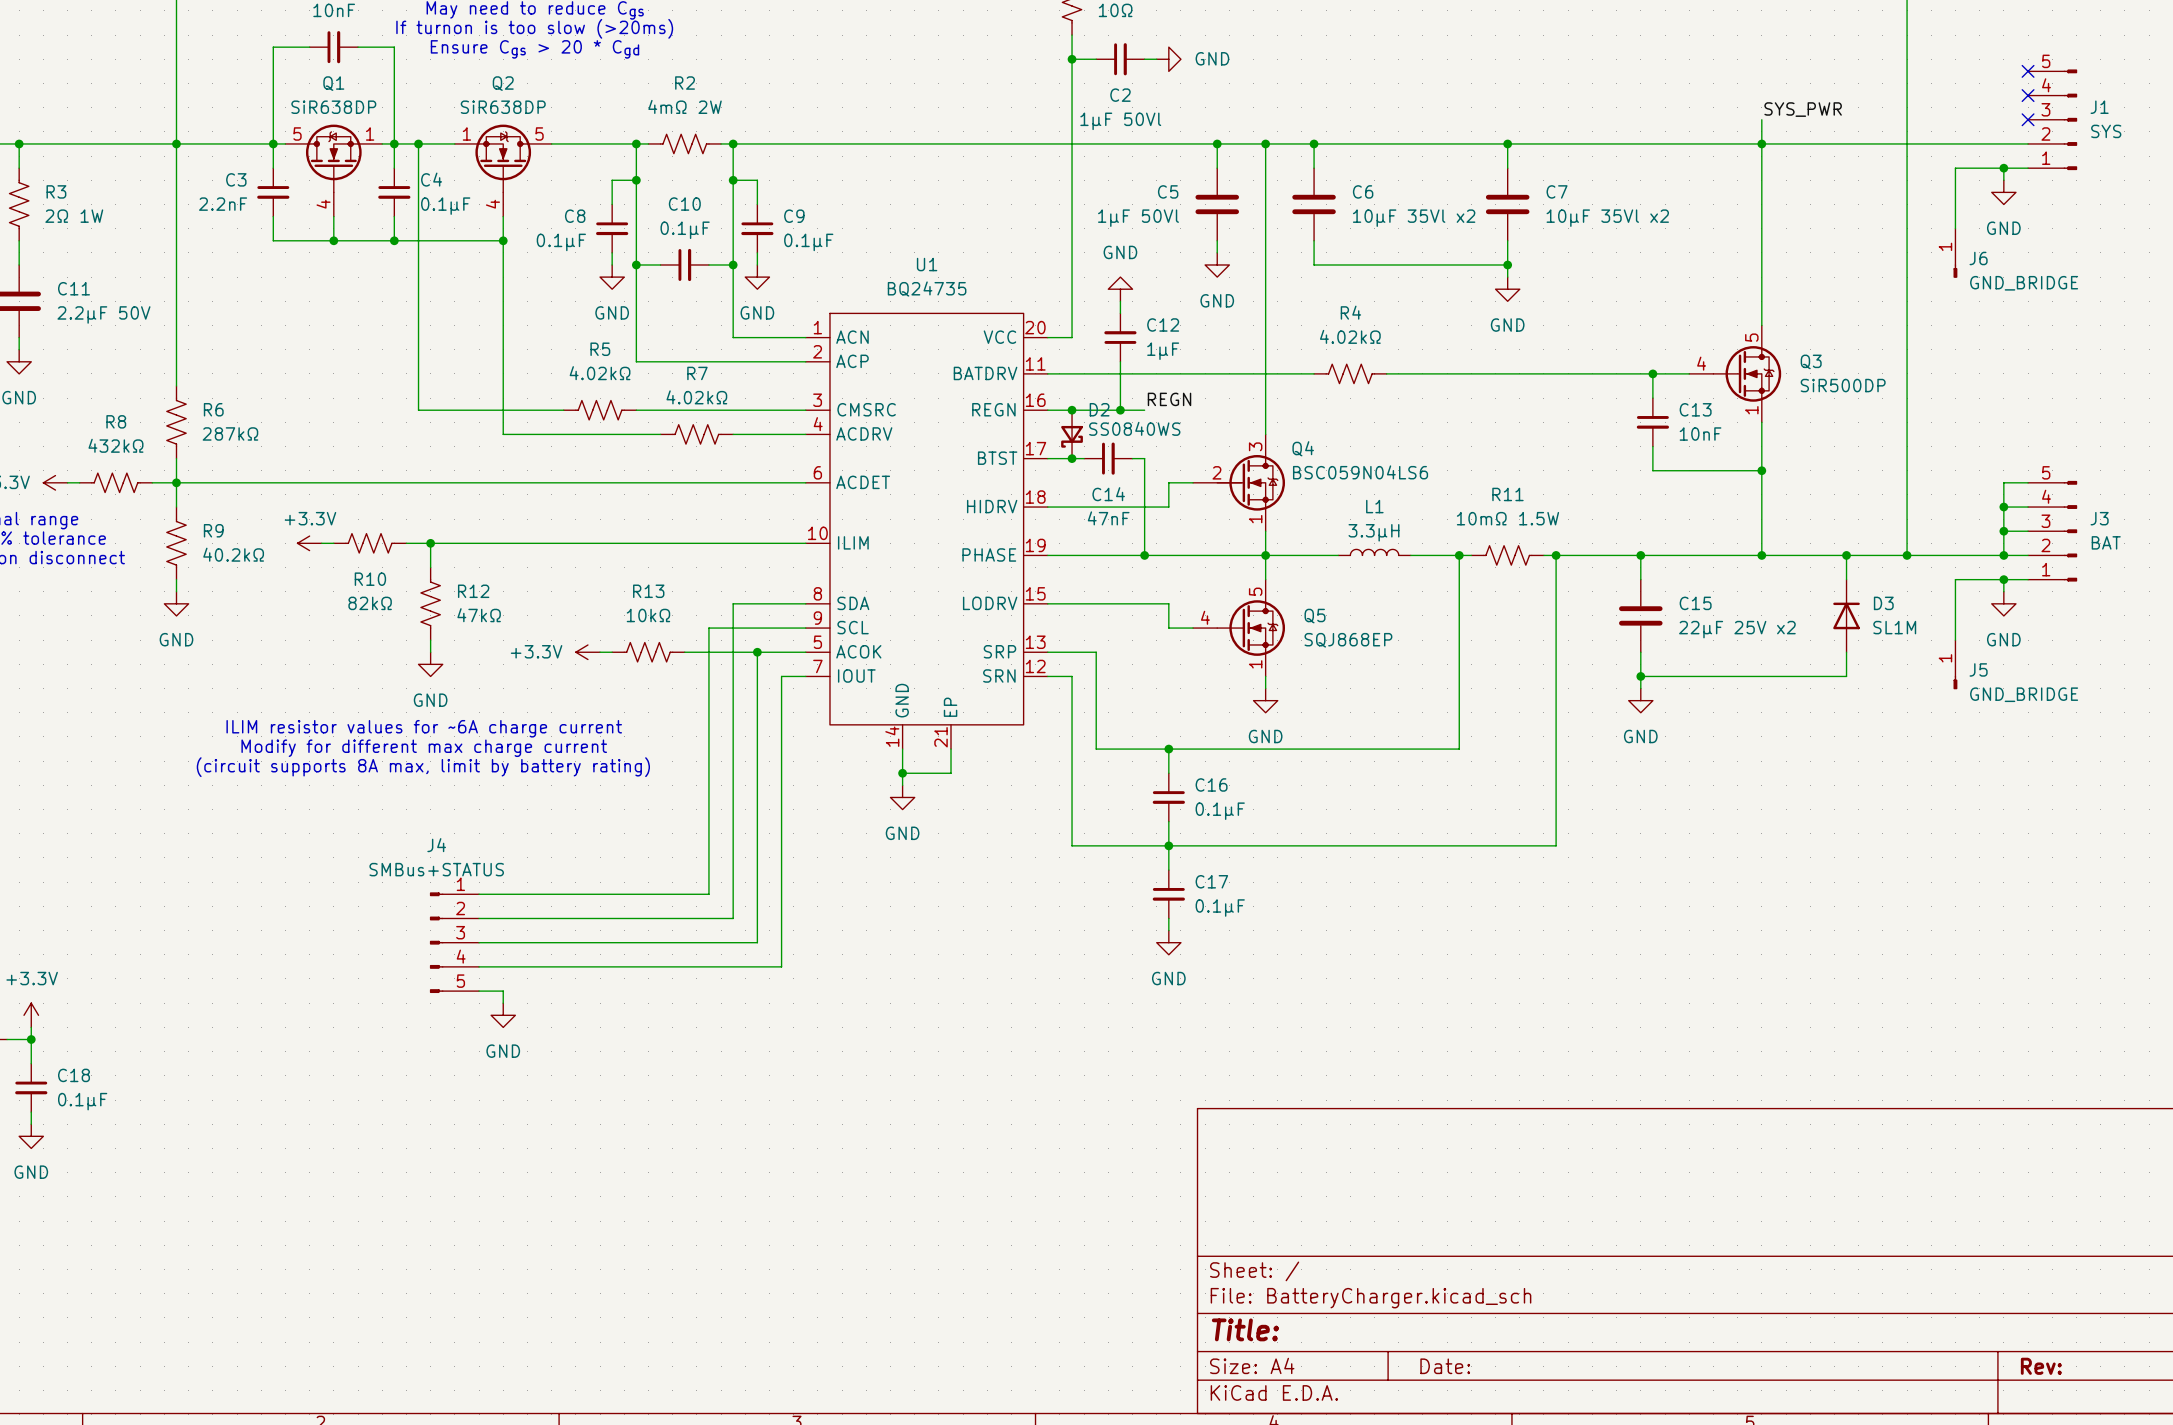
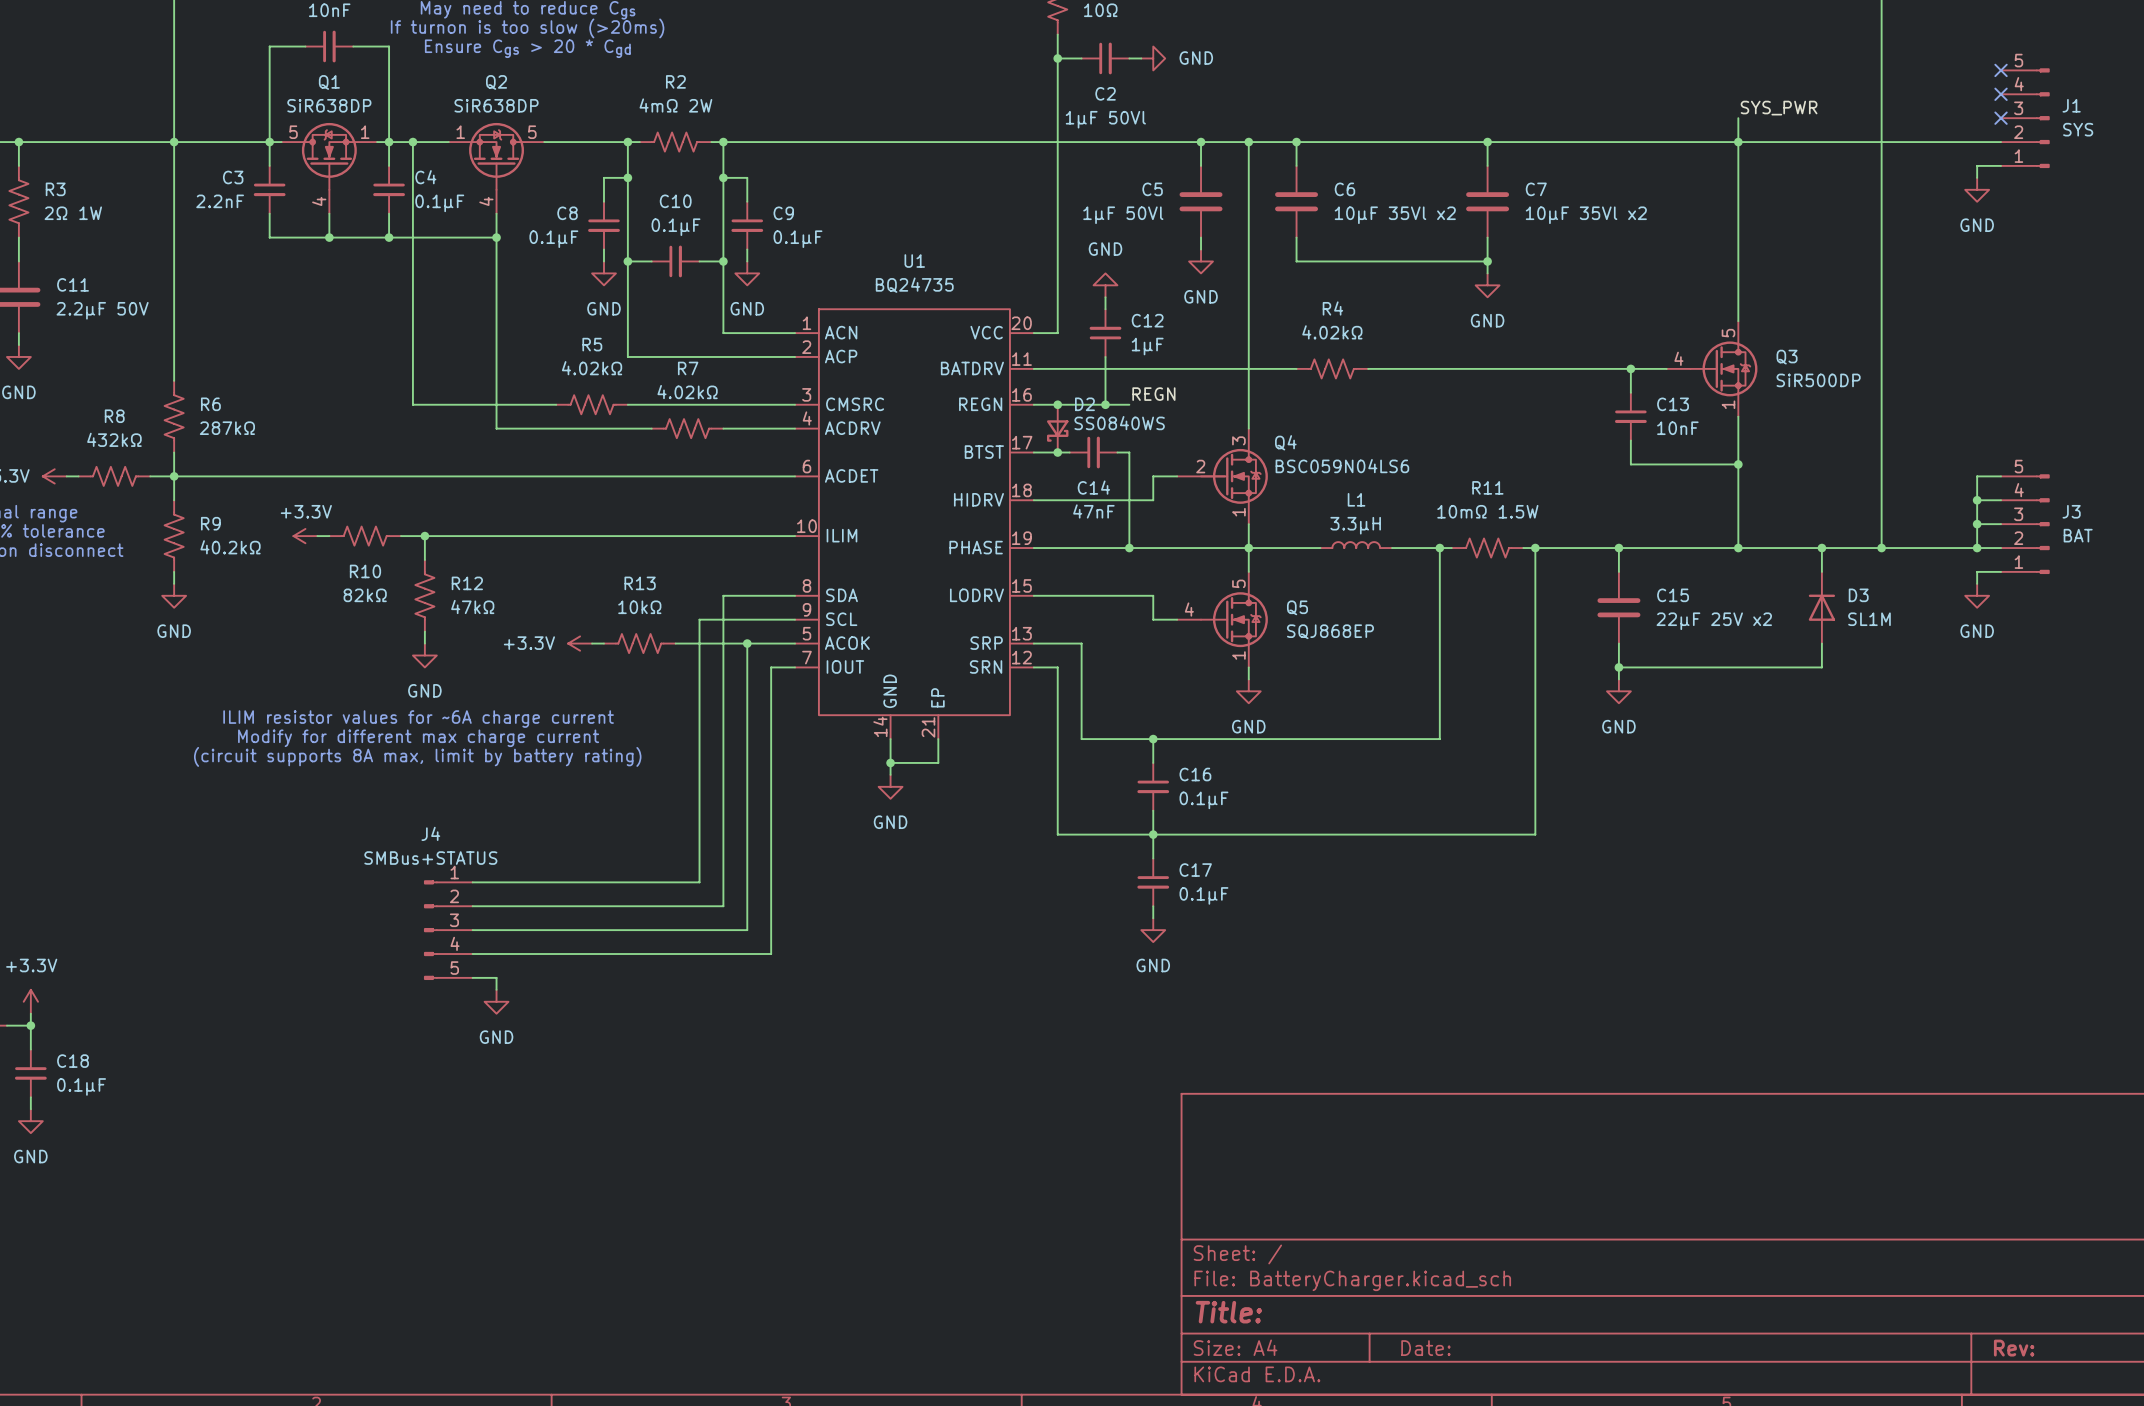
wire: (2003, 168) (1955, 168) (1955, 228) -> none
junction: (2003, 168) -> none
J6: GND_BRIDGE (1955, 253) -> none
wire: (2003, 579) (1955, 579) (1955, 640) -> none
junction: (2003, 579) -> none
J5: GND_BRIDGE (1955, 664) -> none

